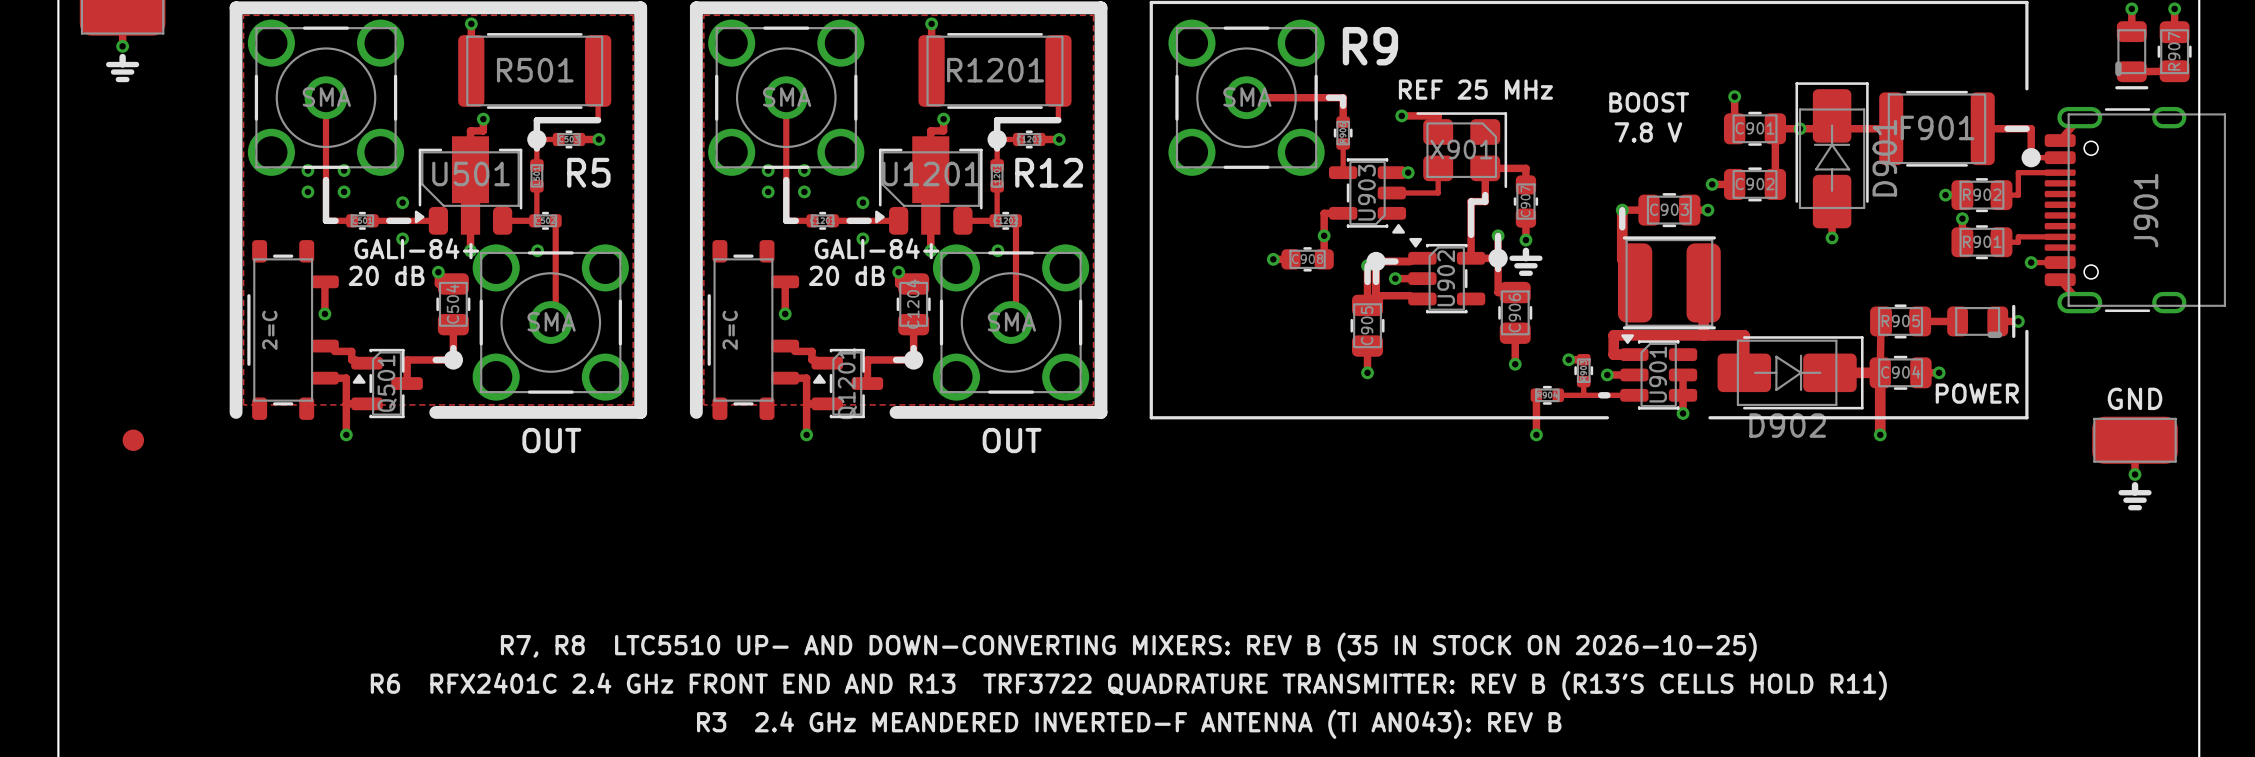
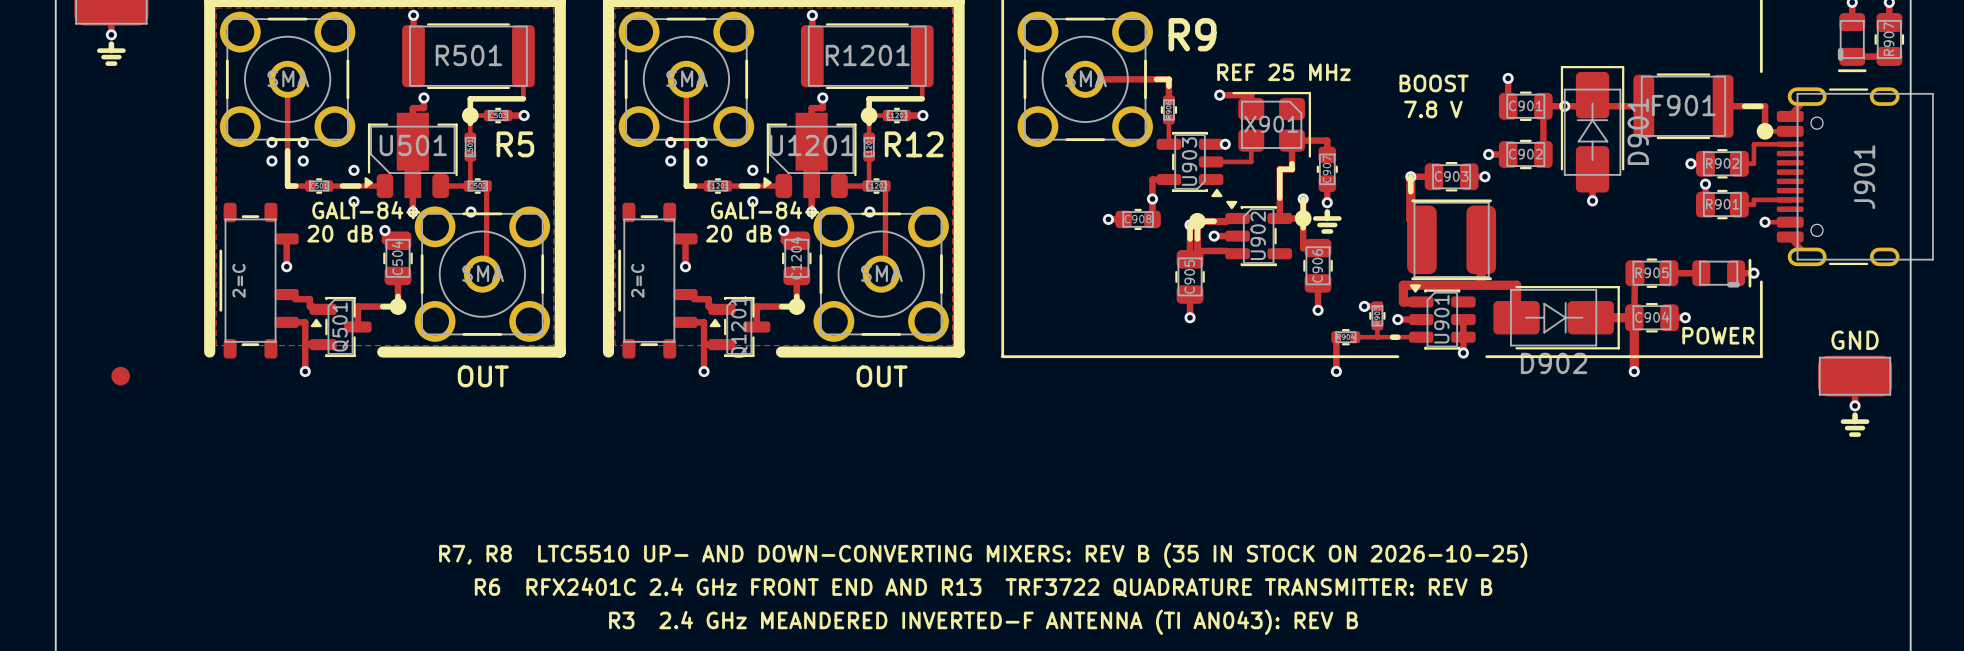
text: R6 RFX2401C 2.4 GHz FRONT END AND R13 TRF3722 QUADRATURE TRANSMITTER: REV B (R13'S CELLS HOLD R11) (1128, 685) -> R6 RFX2401C 2.4 GHz FRONT END AND R13 TRF3722 QUADRATURE TRANSMITTER: REV B (983, 587)

